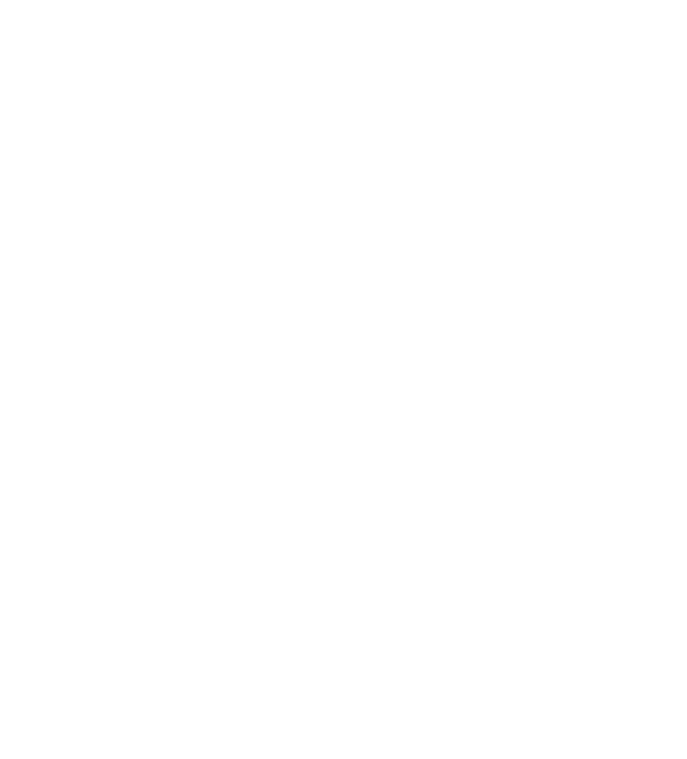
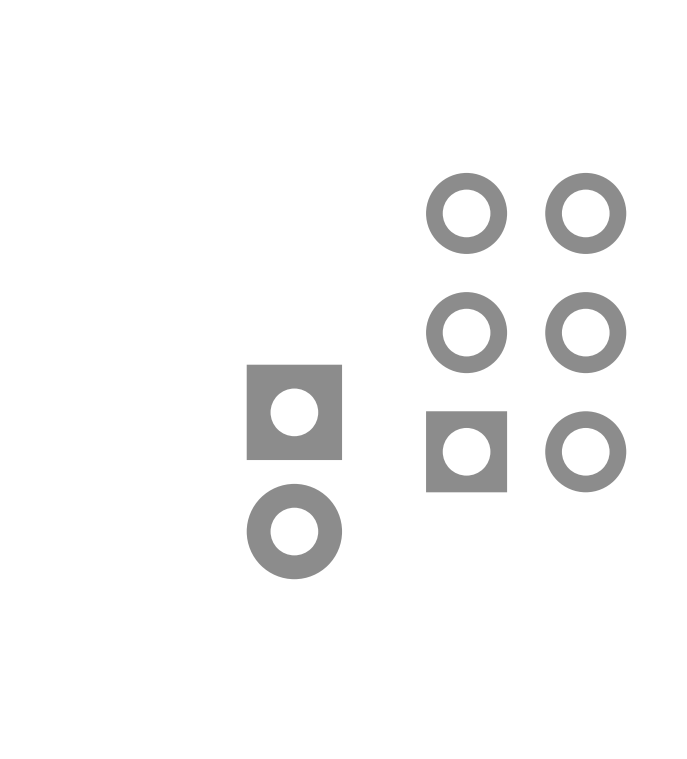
part: none -> (526, 332)
part: none -> (294, 471)

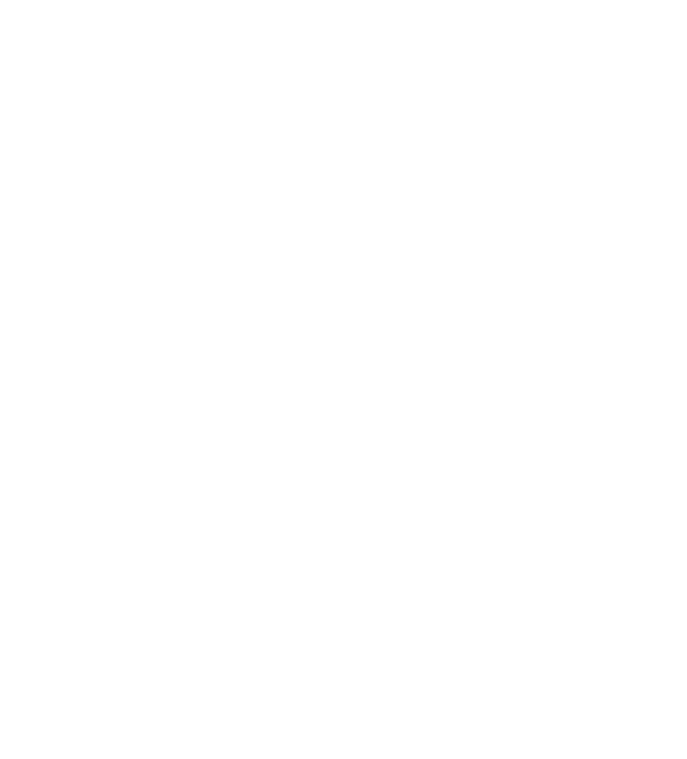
part: (526, 332) -> none
part: (294, 471) -> none

